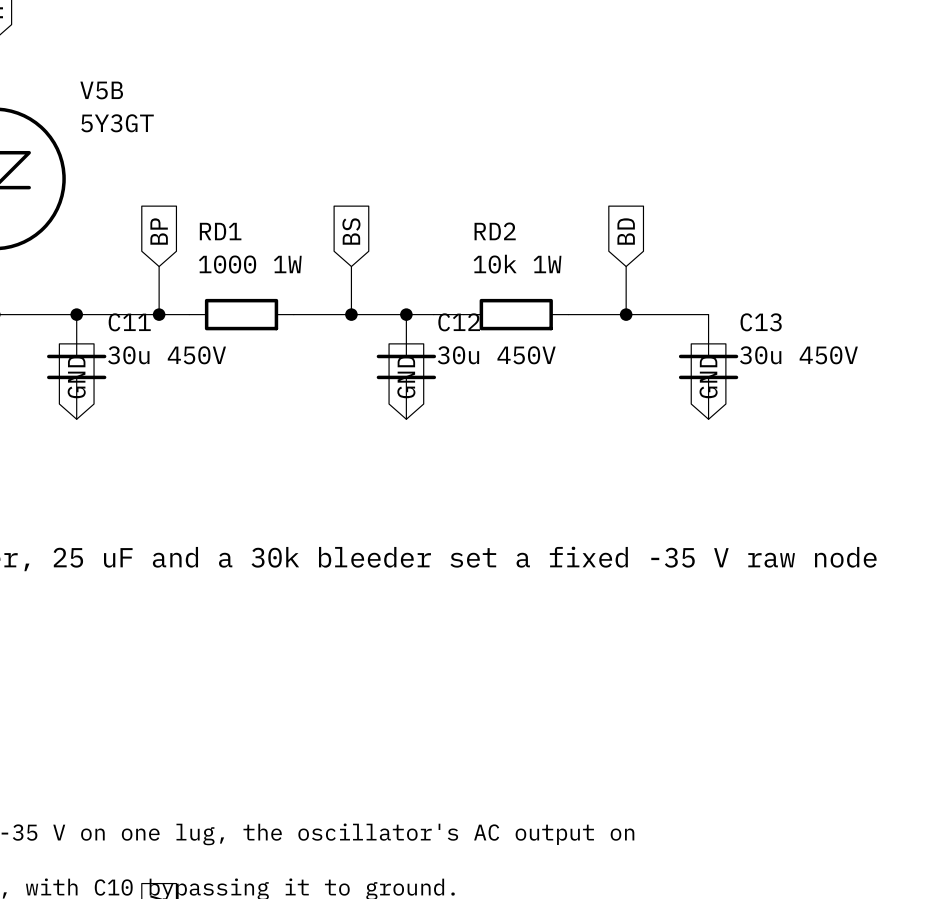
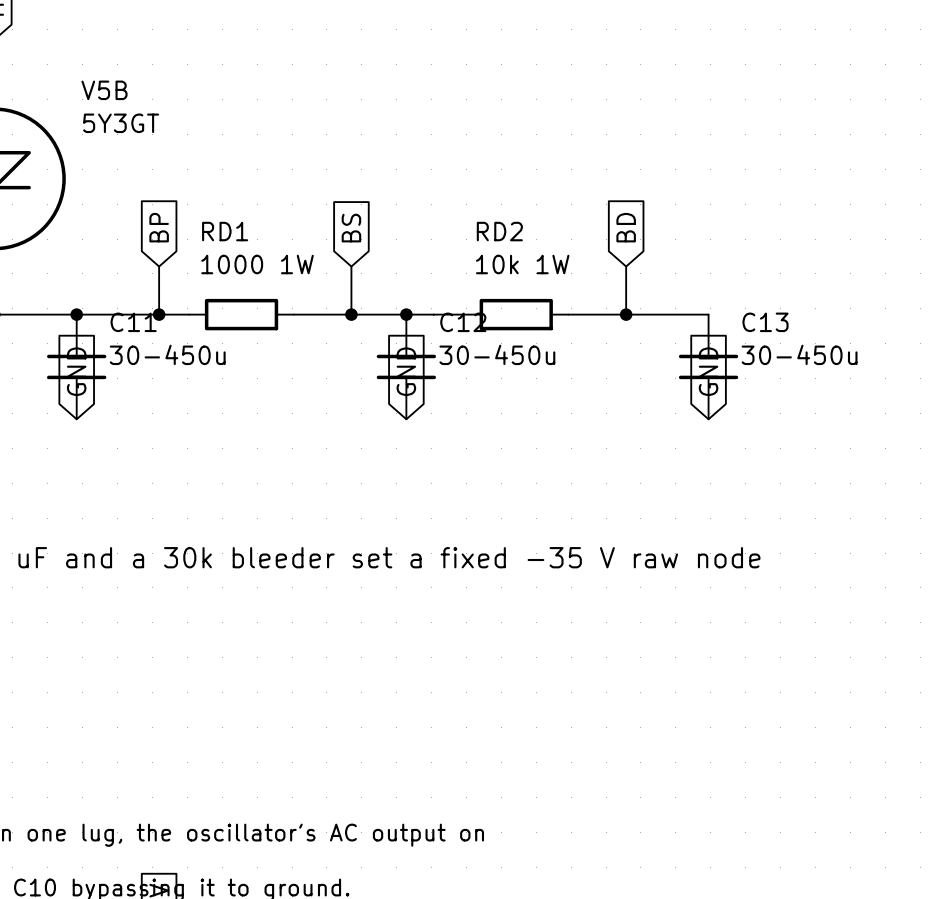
C11 value: 30u 450V (167, 355) -> 30-450u (167, 354)
C12 value: 30u 450V (496, 355) -> 30-450u (497, 354)
C13 value: 30u 450V (798, 355) -> 30-450u (799, 354)

